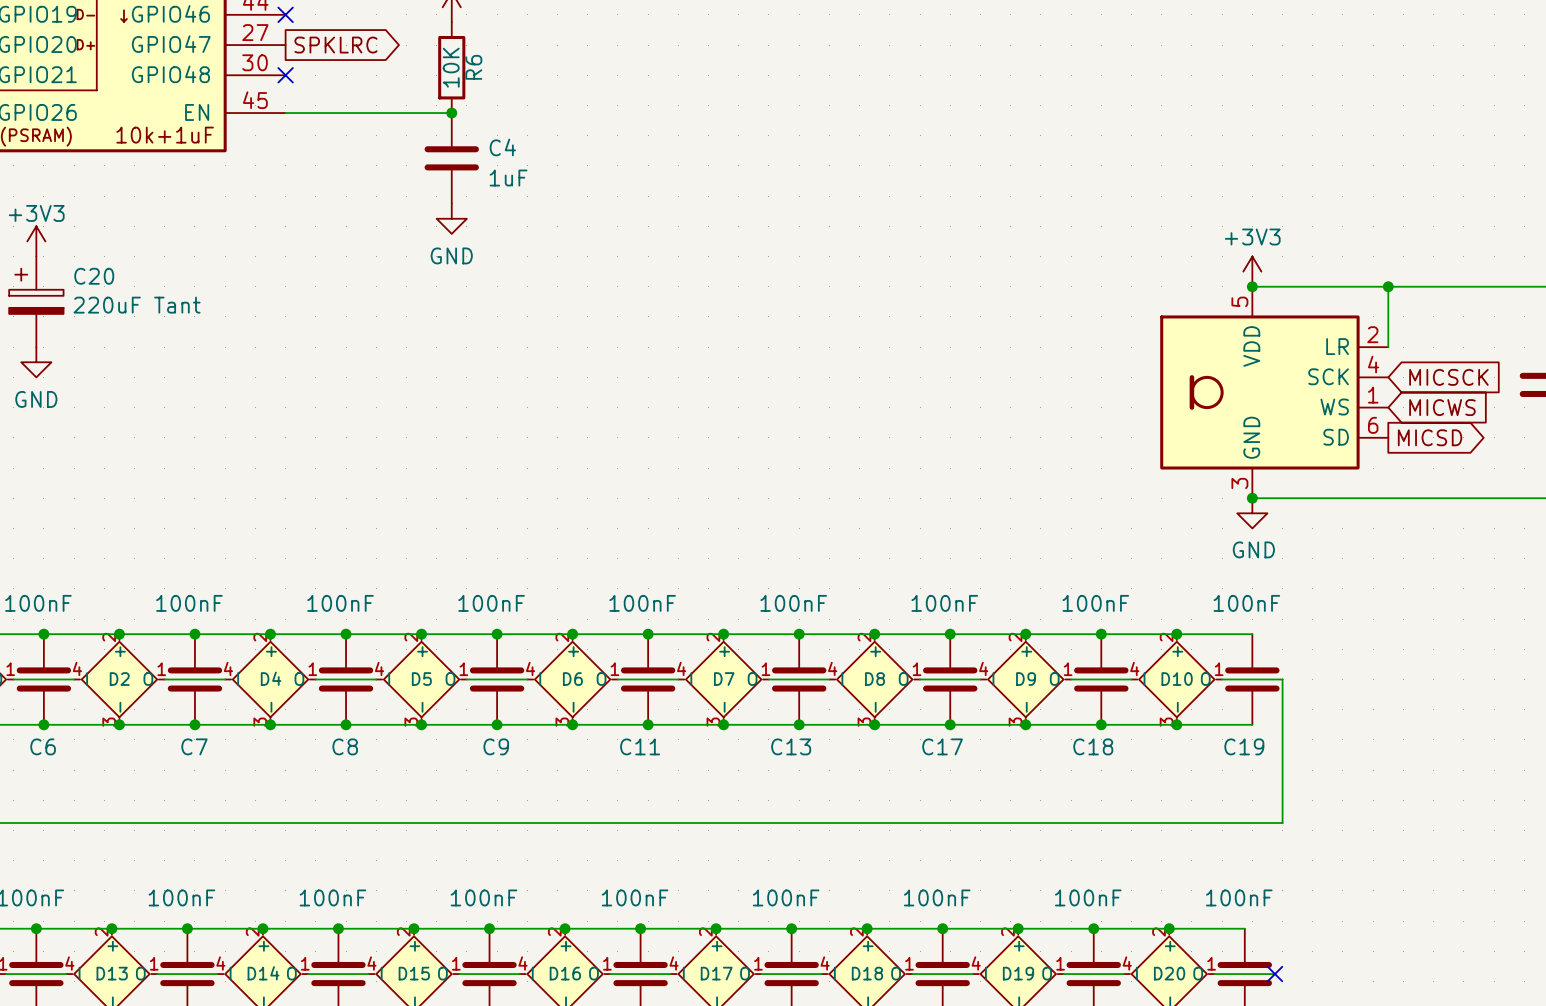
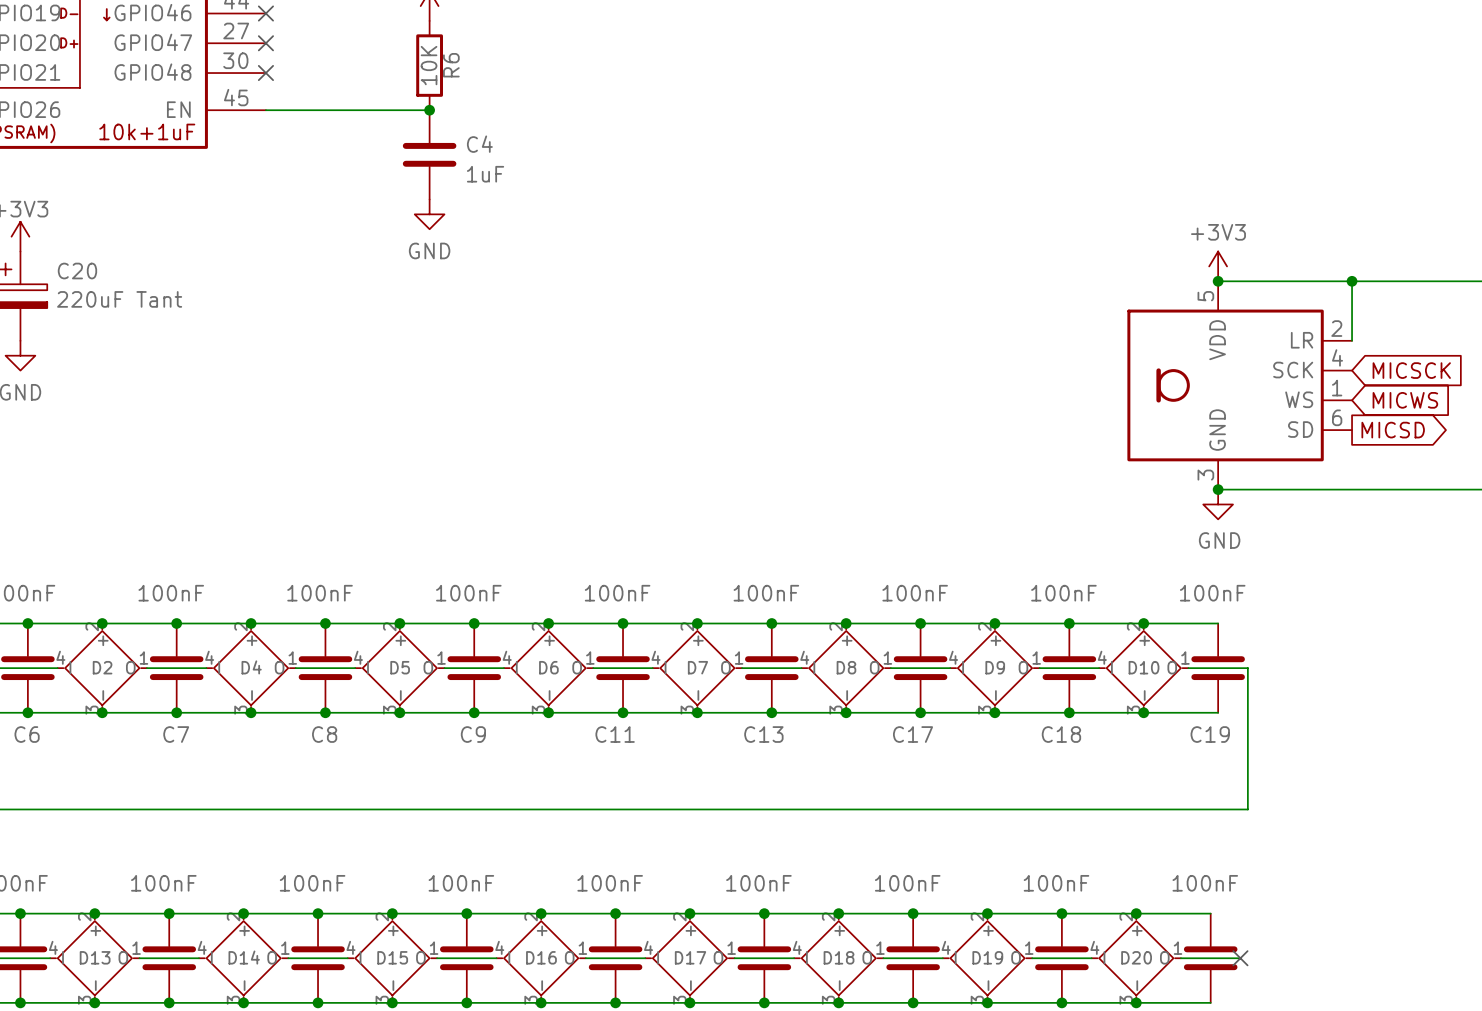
no-connect mark: none -> (265, 43)
global label: SPKLRC (335, 45) -> none

